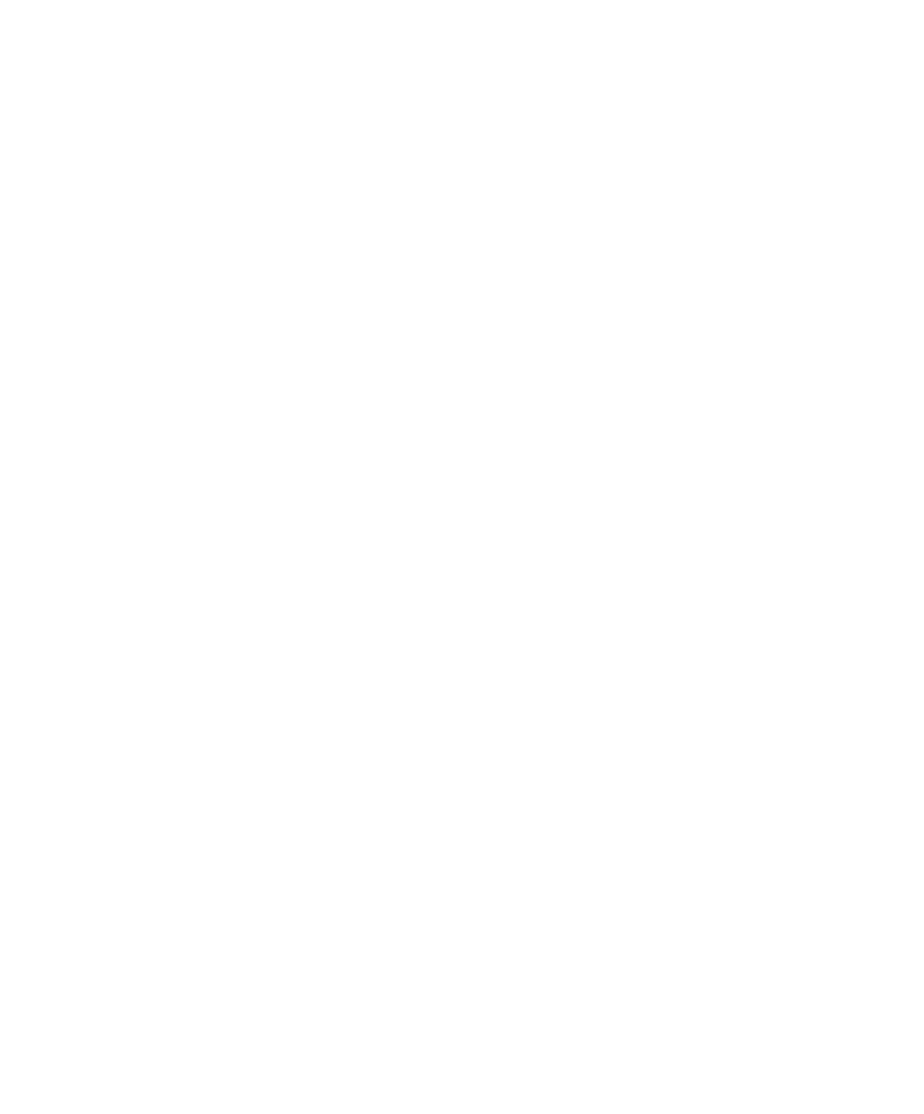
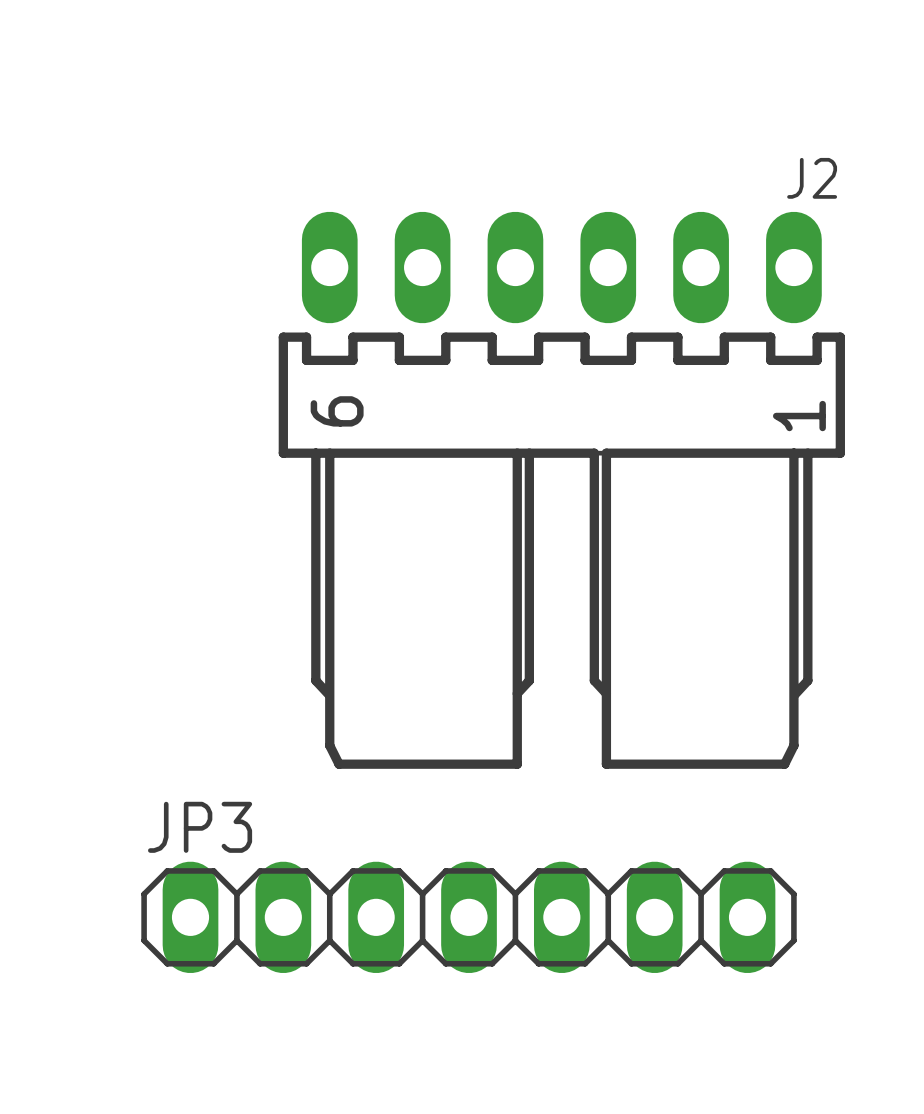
J2: none -> (561, 490)
JP3: none -> (469, 917)

